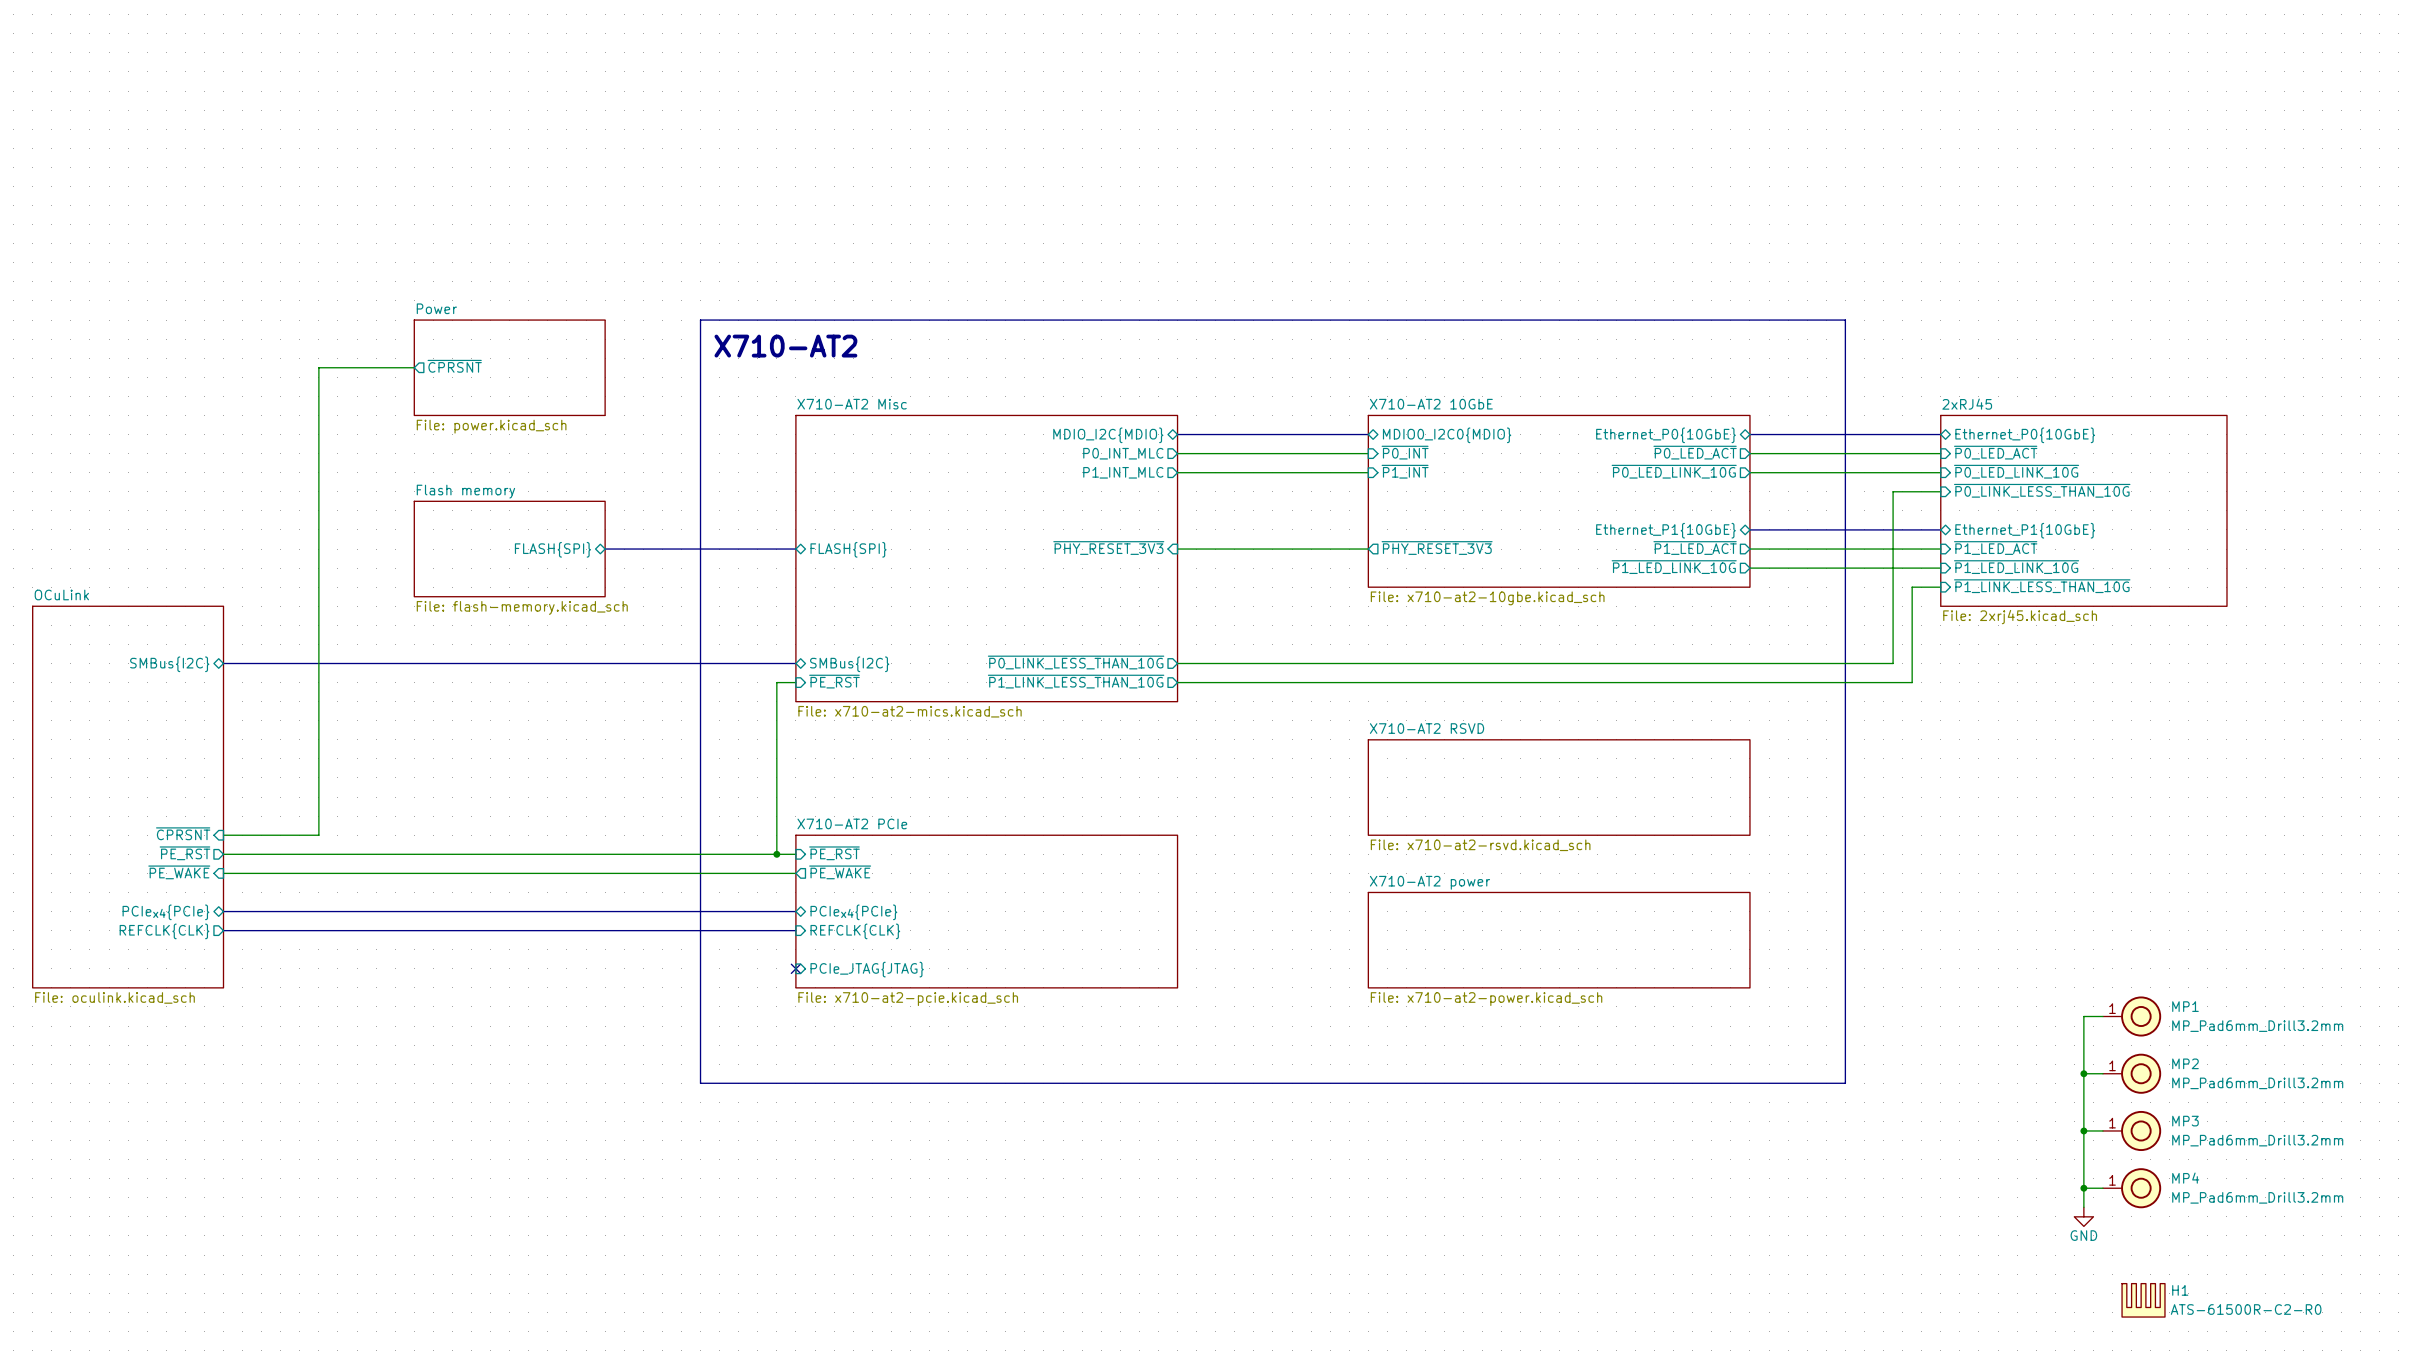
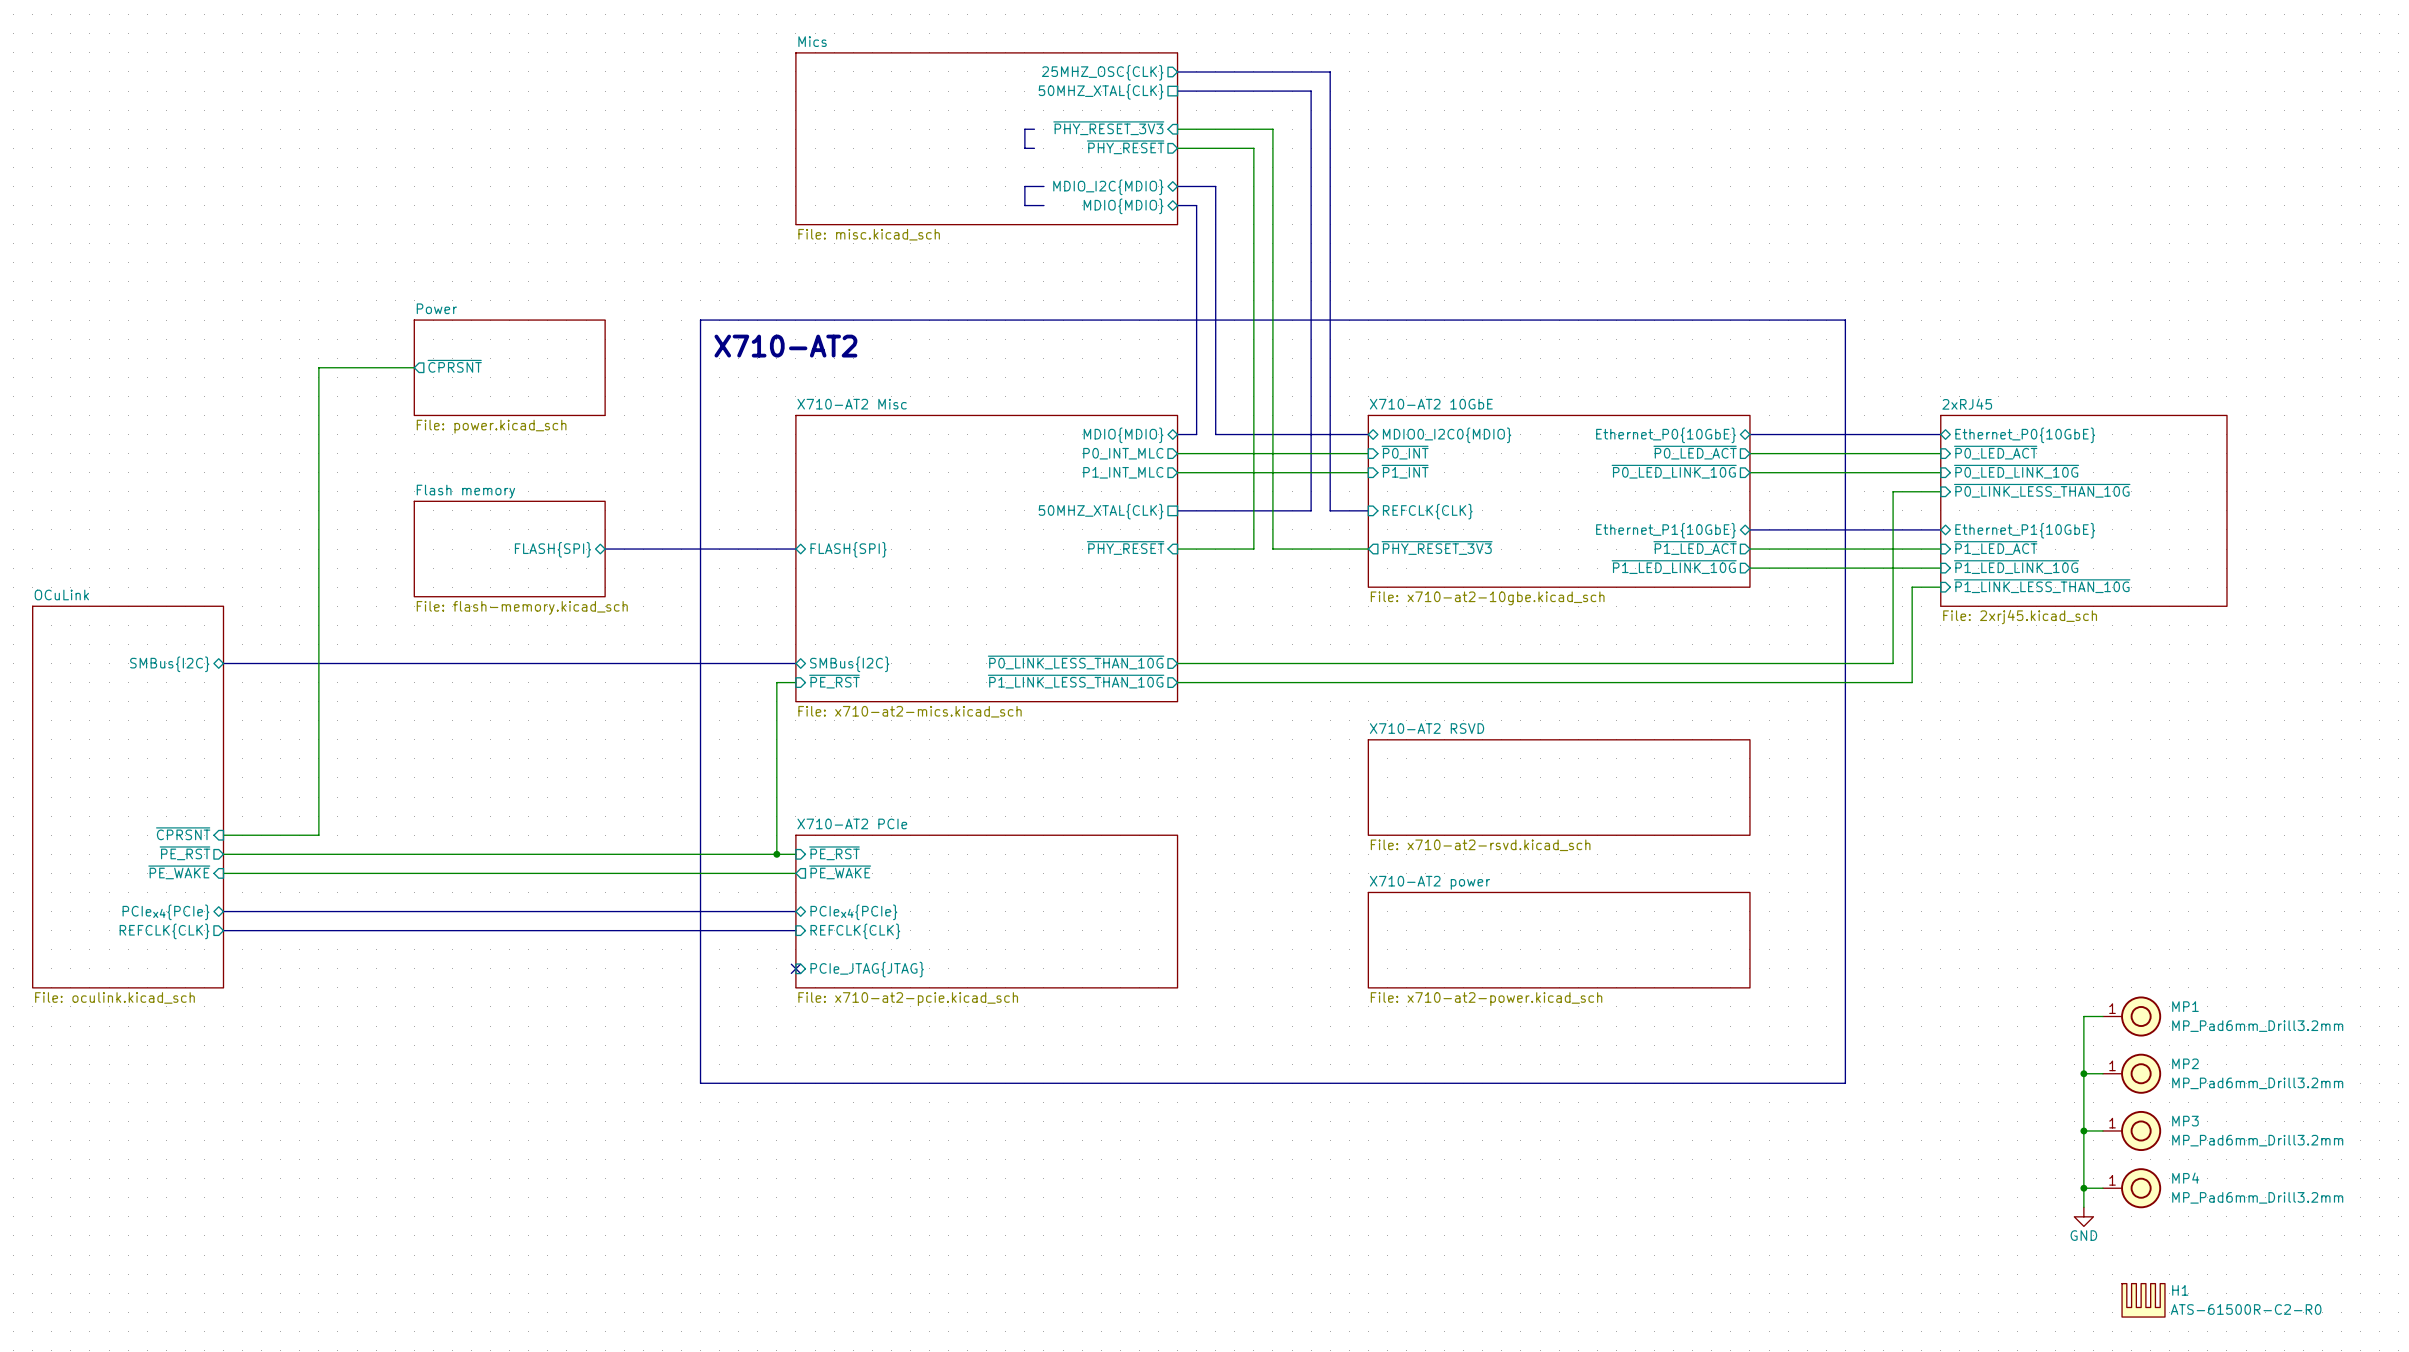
bus: none -> (1177, 71) (1330, 71) (1330, 510) (1368, 510)
sheet pin: none -> 25MHZ_OSC{CLK} (1102, 72)
sheet pin: none -> 50MHZ_XTAL{CLK} (1101, 91)
bus: none -> (1177, 91) (1311, 91) (1311, 510) (1177, 510)
sheet pin: none -> ~{PHY_RESET_3V3} (1108, 128)
line: none -> (1034, 129) (1024, 129) (1024, 148) (1034, 148)
wire: none -> (1177, 129) (1272, 129) (1272, 549)
sheet Mics: none -> File: misc.kicad_sch (986, 138)
sheet pin: none -> ~{PHY_RESET} (1125, 147)
line: none -> (1043, 186) (1024, 186) (1024, 205) (1043, 205)
bus: none -> (1177, 186) (1215, 186) (1215, 434)
sheet pin: none -> MDIO_I2C{MDIO} (1108, 187)
sheet pin: none -> MDIO{MDIO} (1123, 206)
bus: (1196, 434) (1215, 434) -> (1196, 434) (1196, 205) (1177, 205)
sheet pin: MDIO_I2C{MDIO} (1108, 435) -> MDIO{MDIO} (1123, 435)
sheet pin: none -> 50MHZ_XTAL{CLK} (1101, 511)
sheet pin: none -> REFCLK{CLK} (1427, 511)
sheet pin: ~{PHY_RESET_3V3} (1108, 548) -> ~{PHY_RESET} (1125, 548)
wire: (1253, 549) (1272, 549) -> (1253, 549) (1253, 148) (1177, 148)

